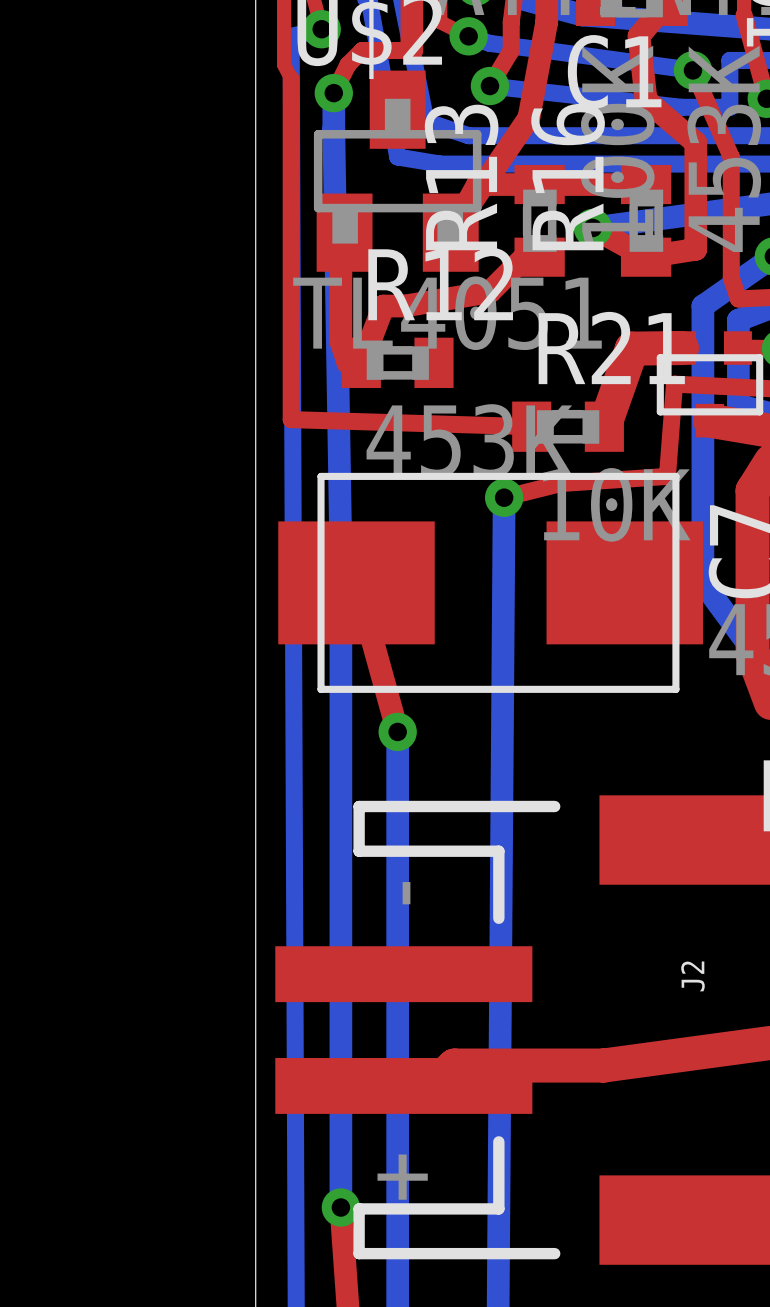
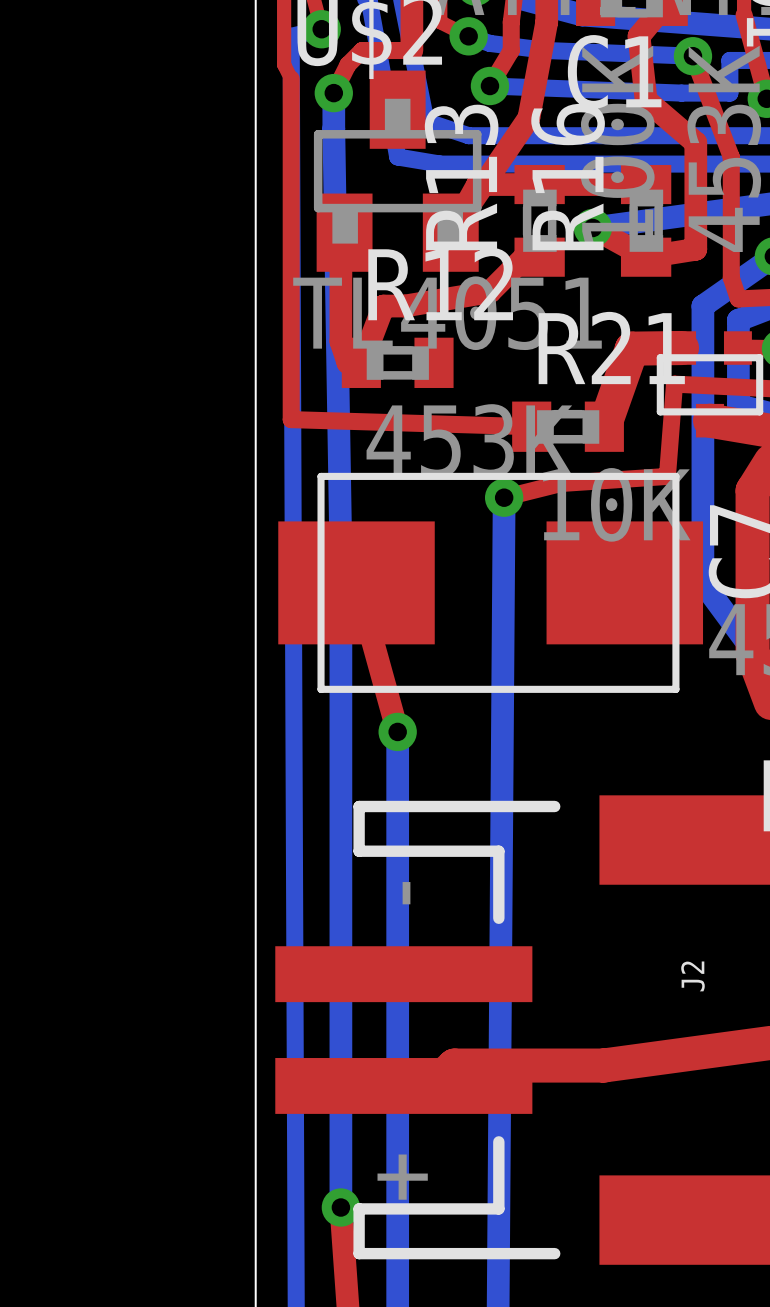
bottom track: (546, 50) (692, 70) -> (546, 50) (692, 56)
top track: (692, 70) (731, 156) -> (692, 56) (731, 156)
via position: (692, 70) -> (692, 56)
bottom track: (489, 86) (681, 107) (729, 107) (729, 93) -> (489, 86) (729, 93)

